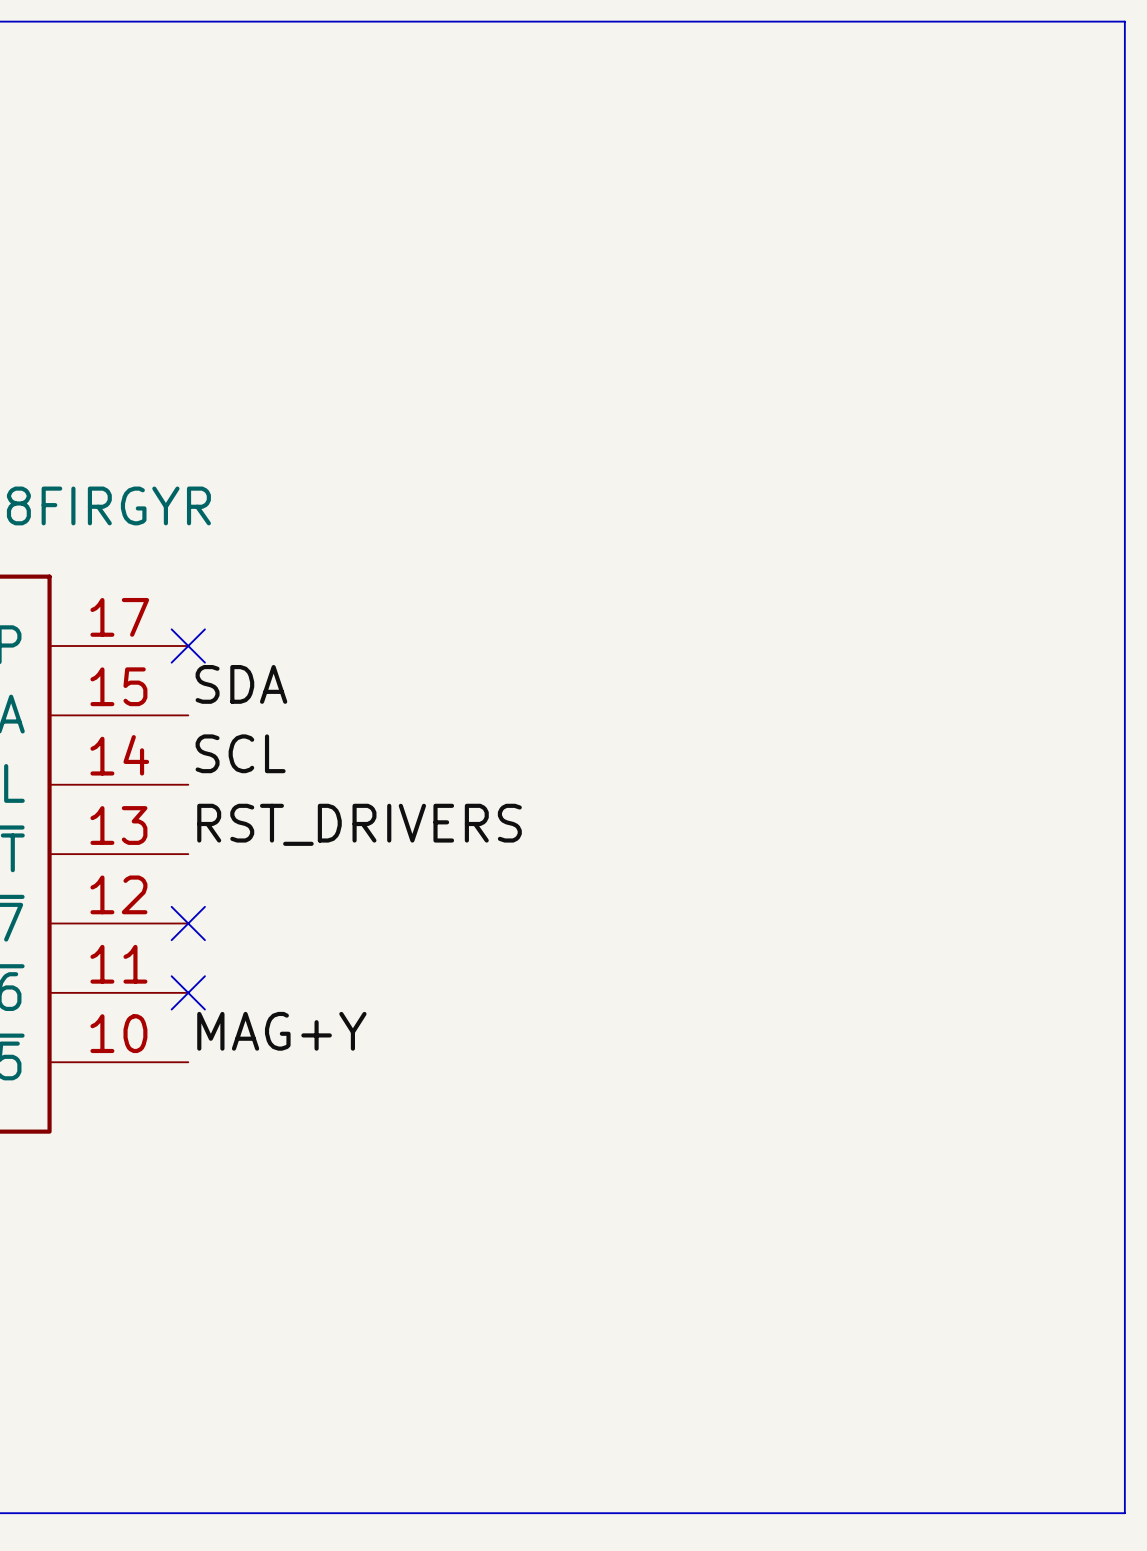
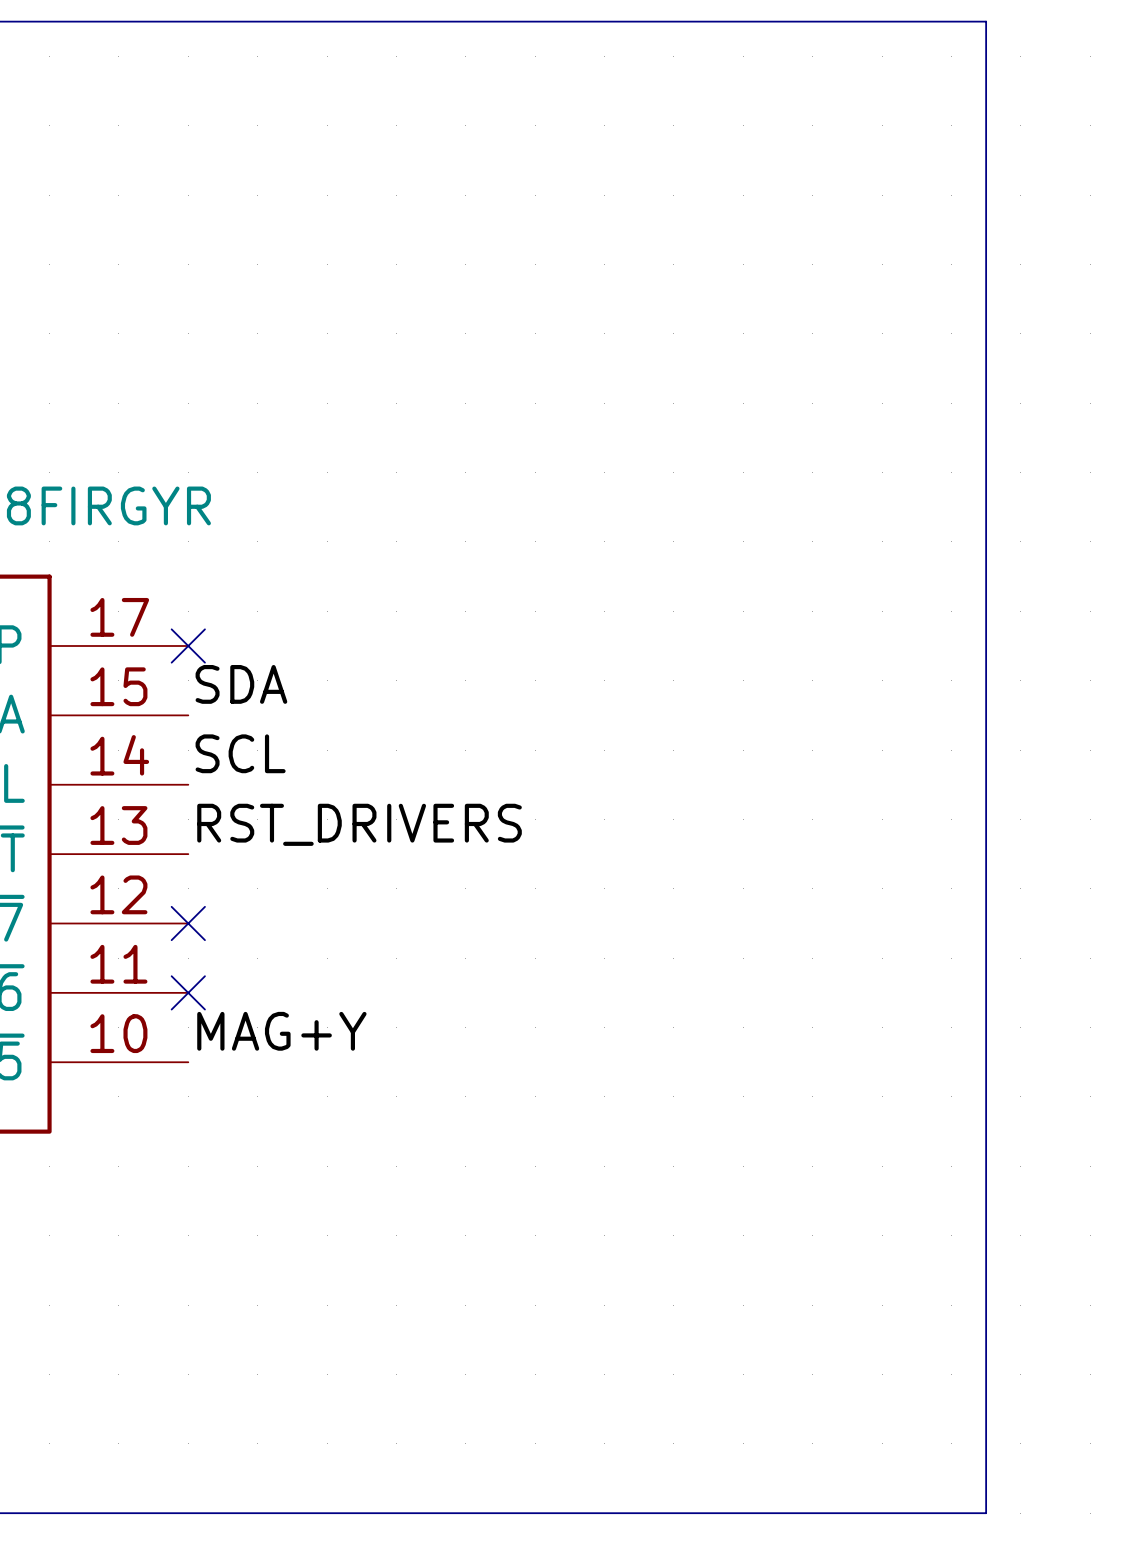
line: (986, 21) (1124, 21) (1124, 1513) (986, 1513) -> (986, 21) (986, 1513)

